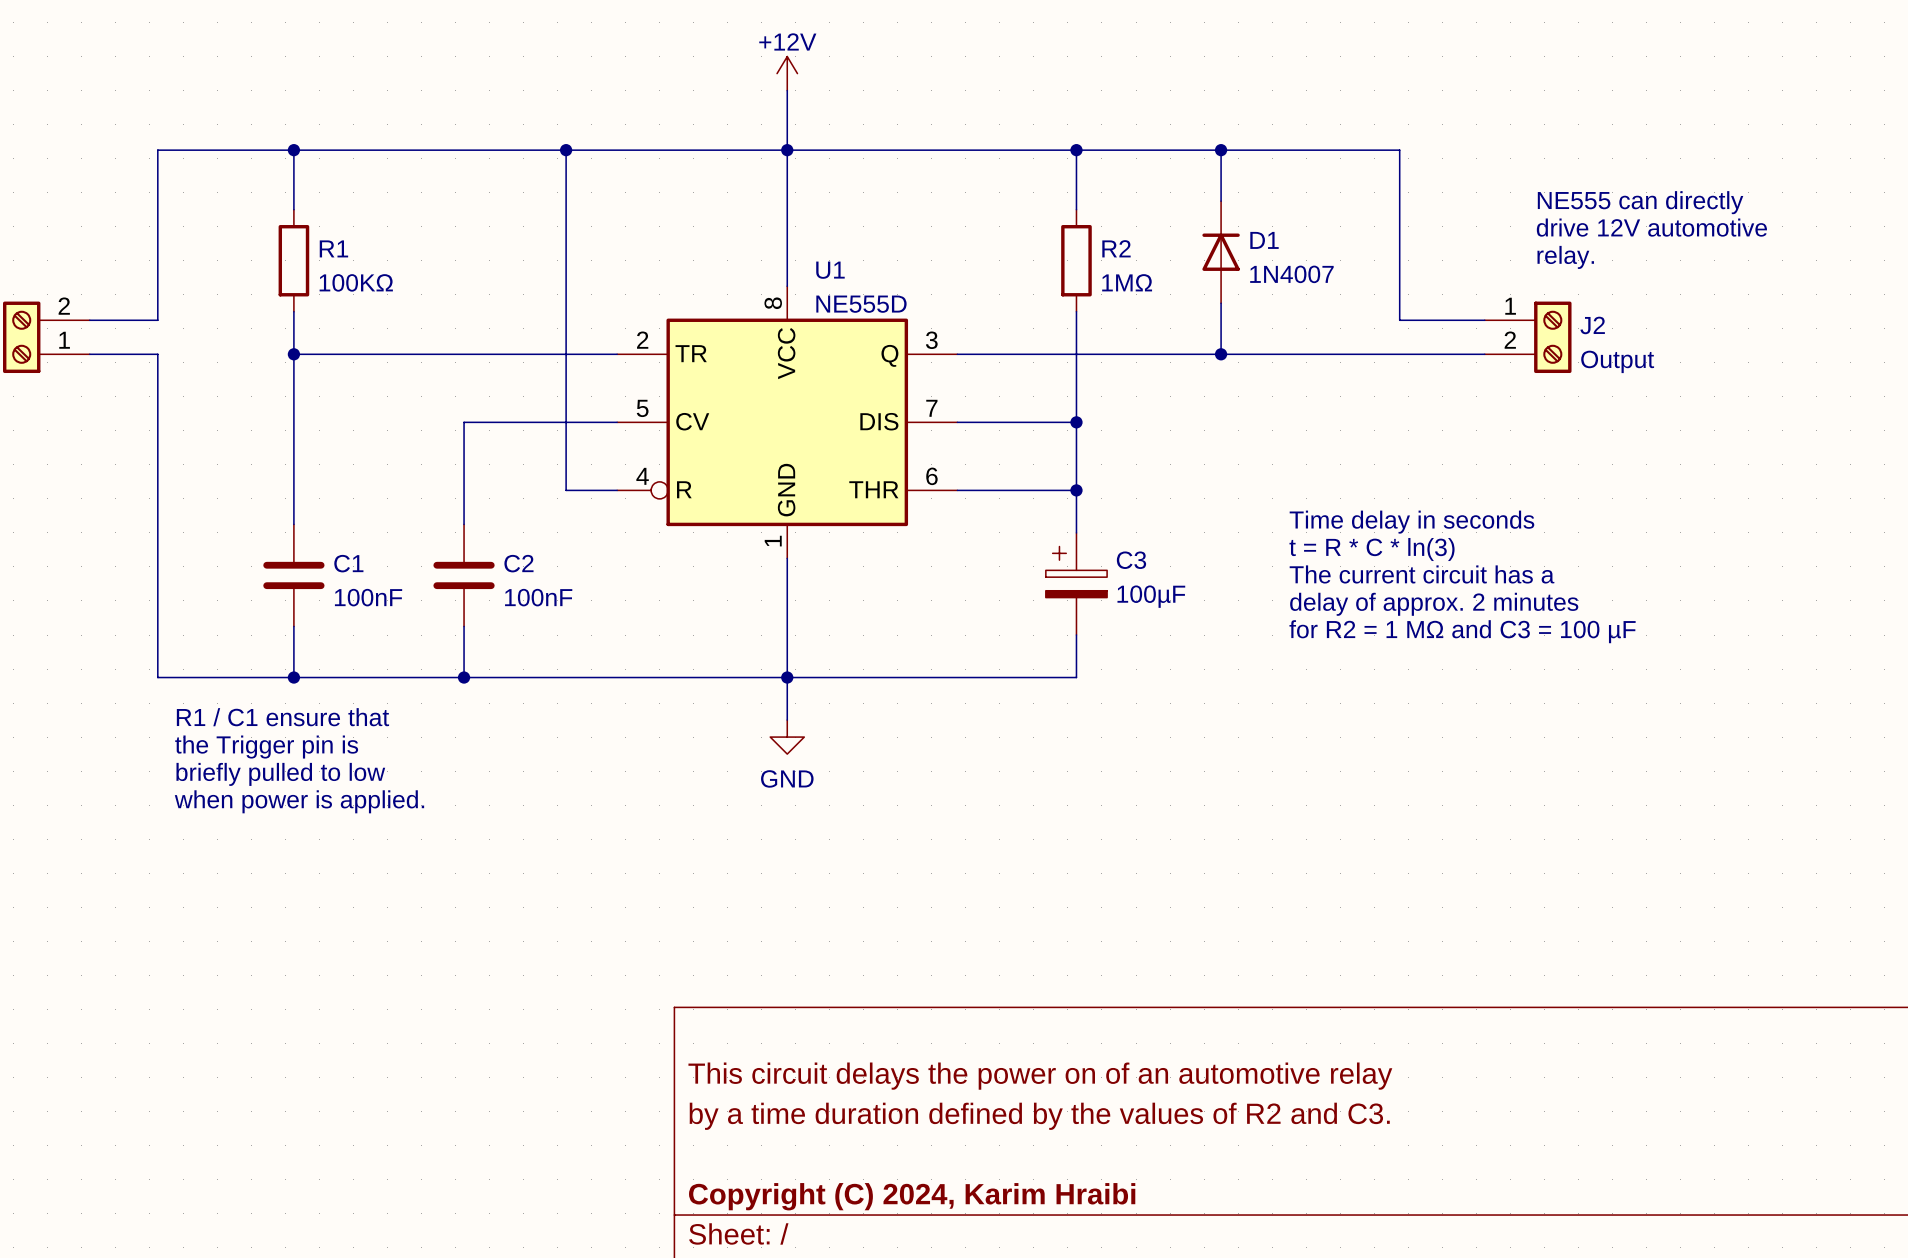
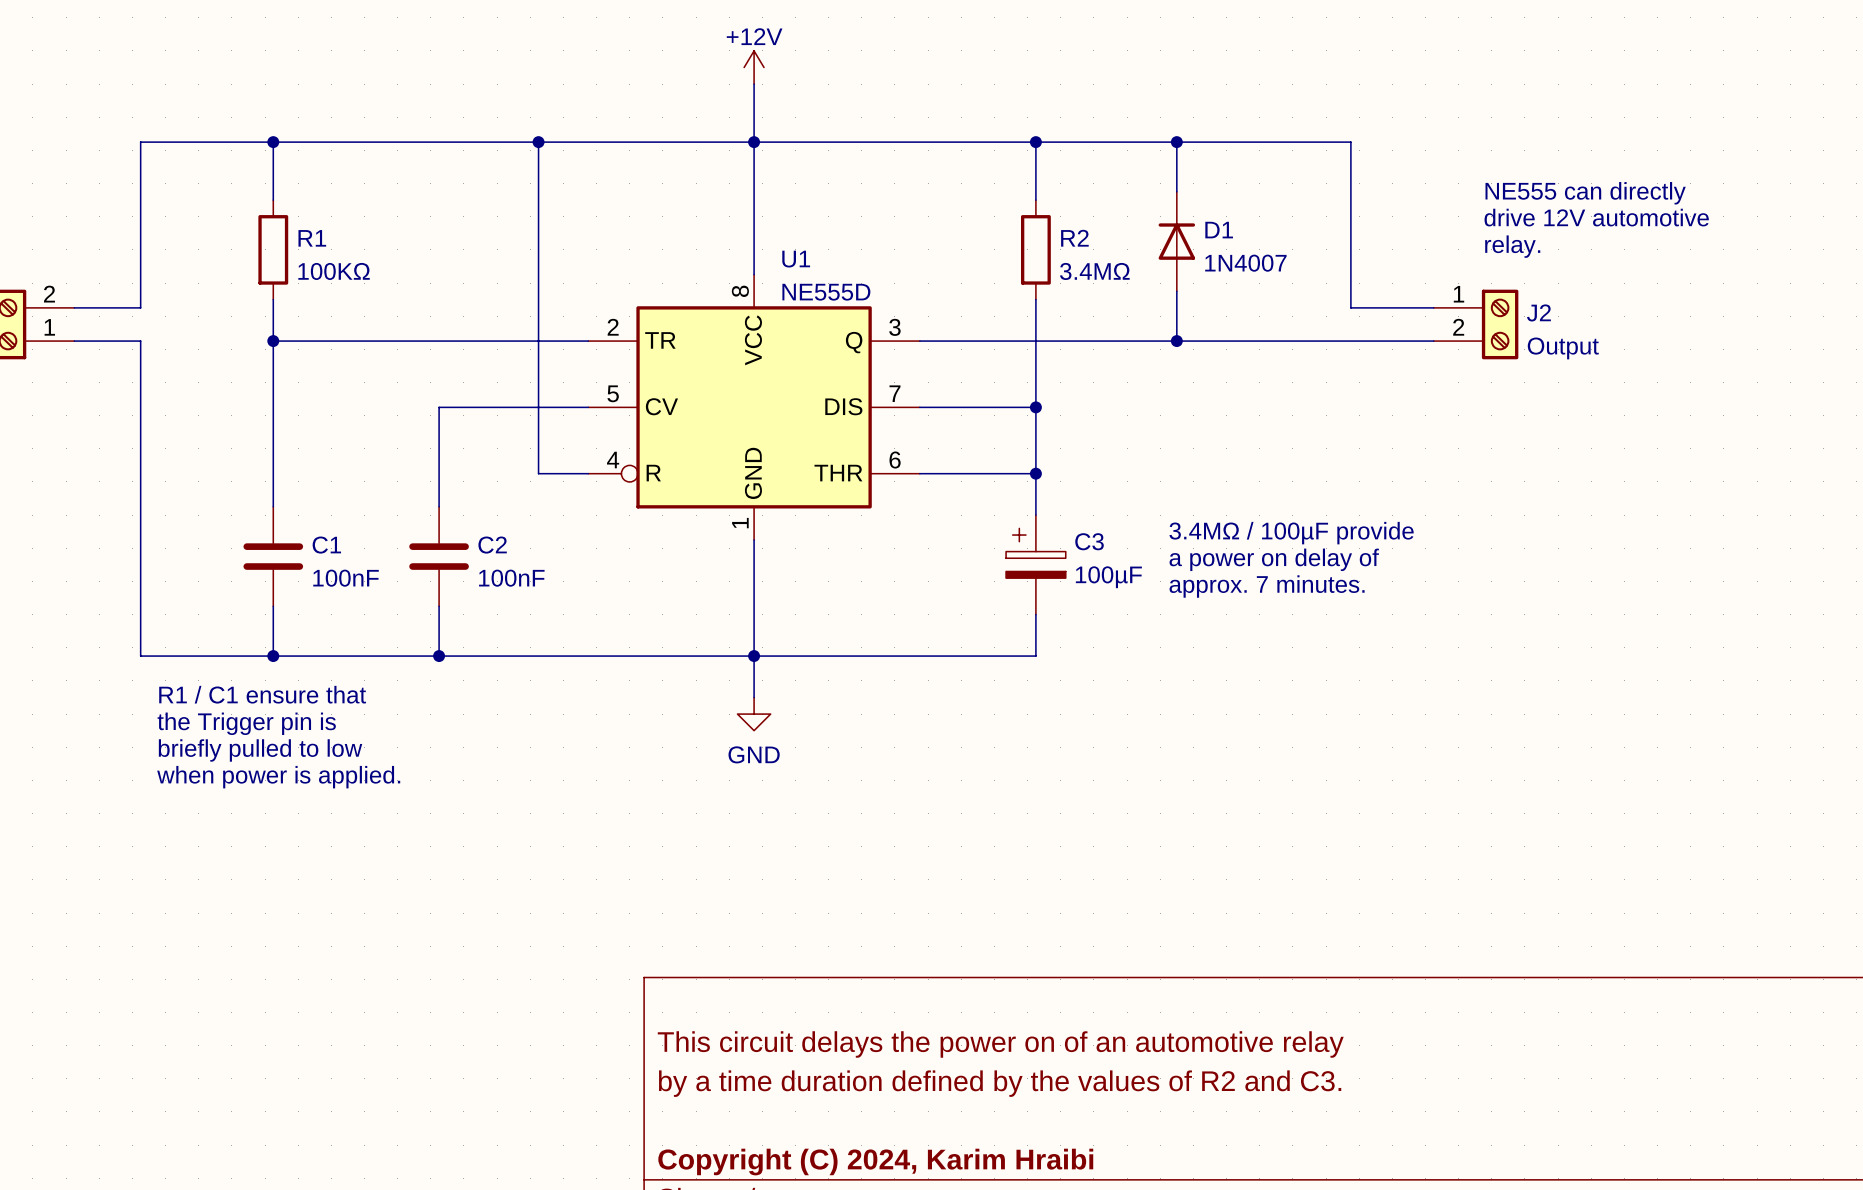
R2 value: 1MΩ (1127, 282) -> 3.4MΩ (1094, 271)
text: Time delay in seconds (1411, 522) -> none
text: t = R * C * ln(3) (1372, 549) -> none
text: none -> 3.4MΩ / 100µF provide (1291, 533)
text: The current circuit has a (1422, 574) -> none
text: none -> a power on delay of (1274, 559)
text: delay of approx. 2 minutes (1434, 604) -> approx. 7 minutes. (1267, 586)
text: for R2 = 1 MΩ and C3 = 100 µF (1462, 631) -> none

